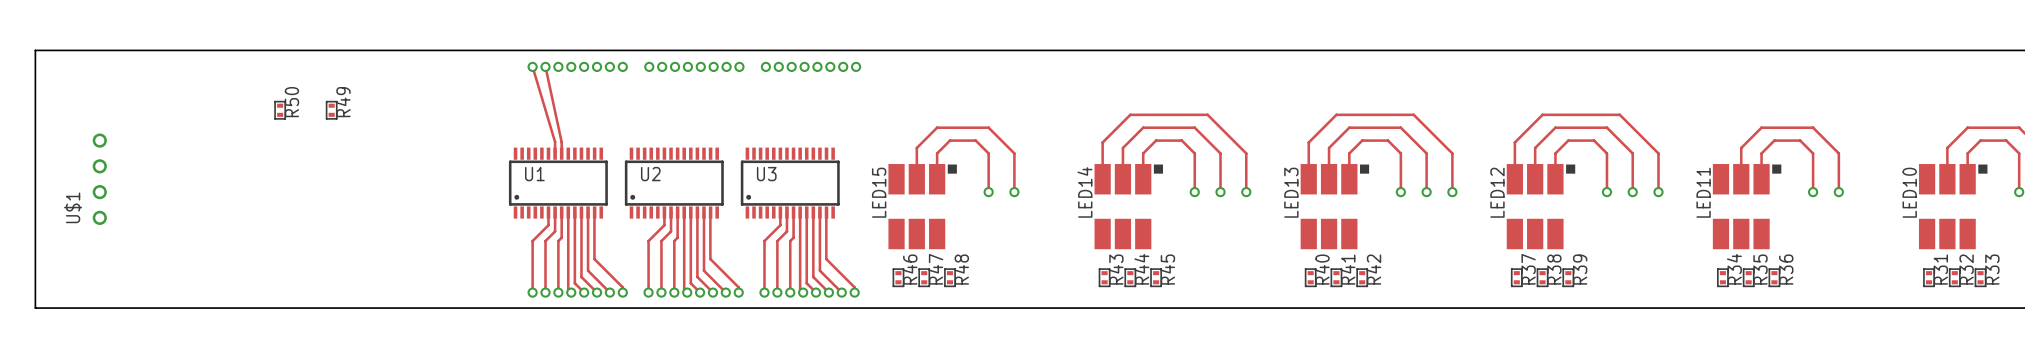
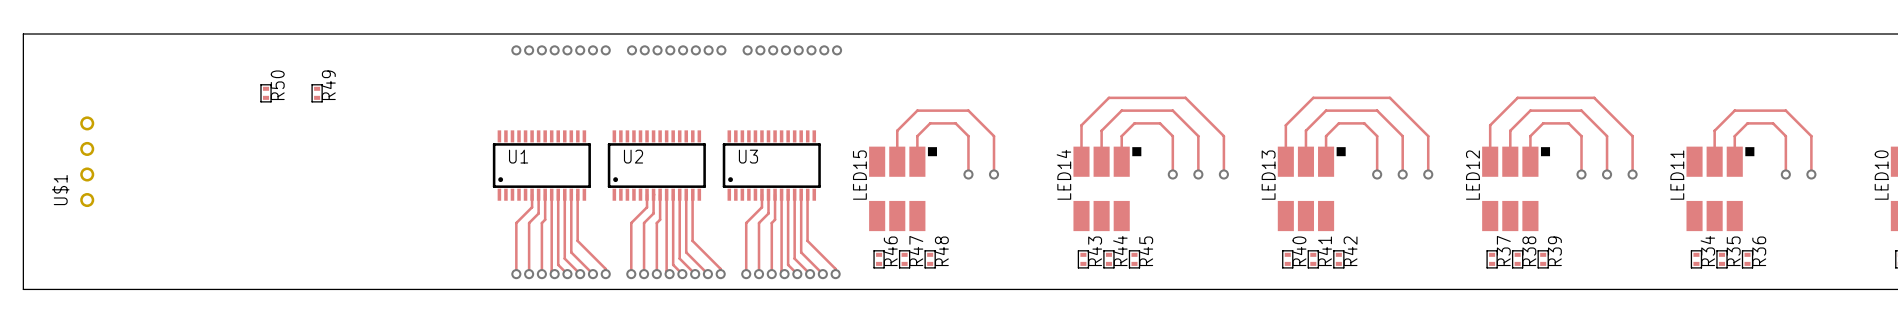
top track: (532, 66) (555, 141) (555, 153) -> none
top track: (545, 66) (561, 142) (561, 153) -> none

